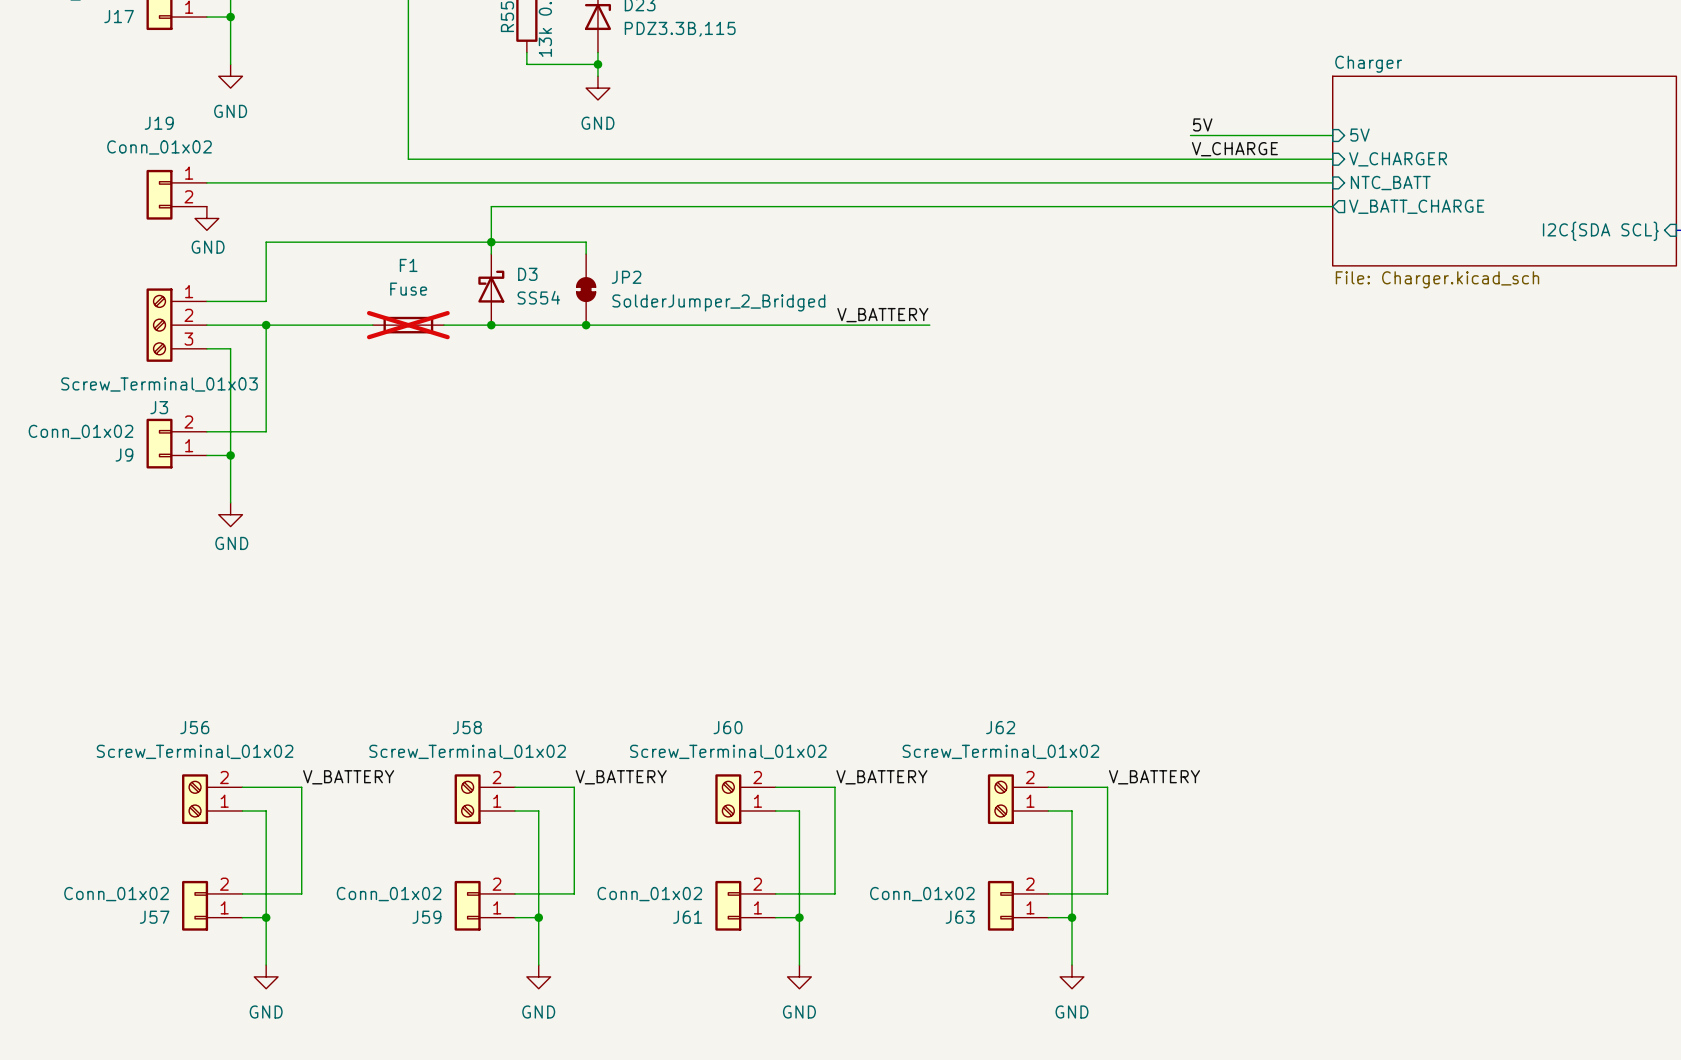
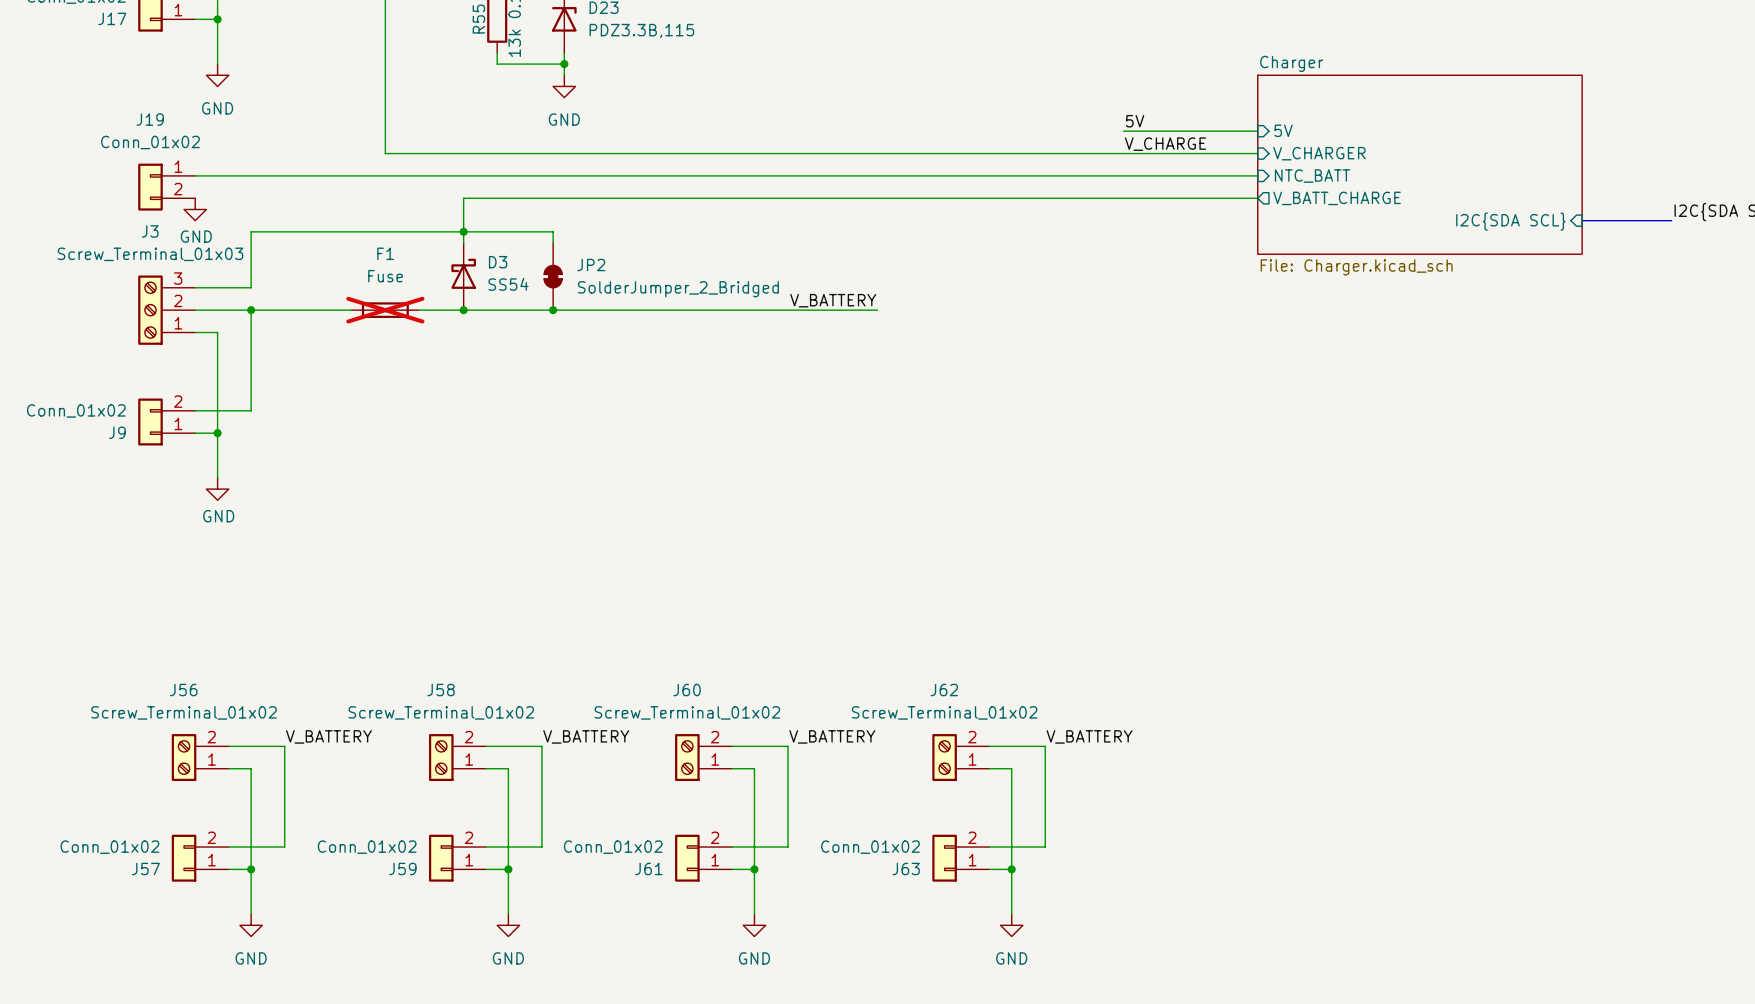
J3 flip: as is (159, 325) -> up-down (150, 310)

